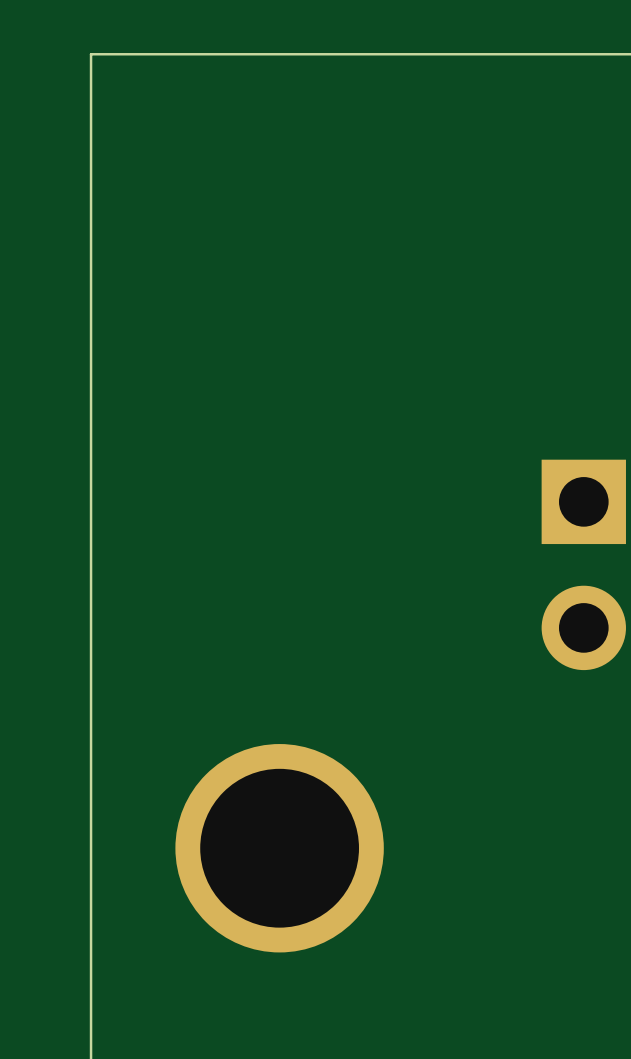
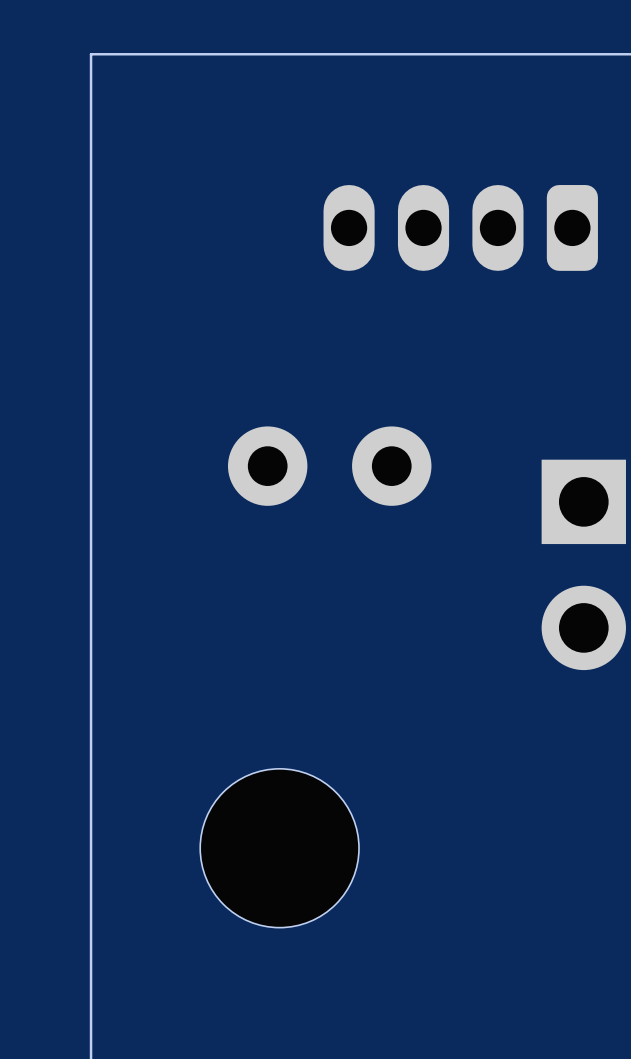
part: none -> (460, 227)
part: none -> (329, 466)
part footprint: [175, 744, 384, 953] -> [200, 768, 360, 928]

